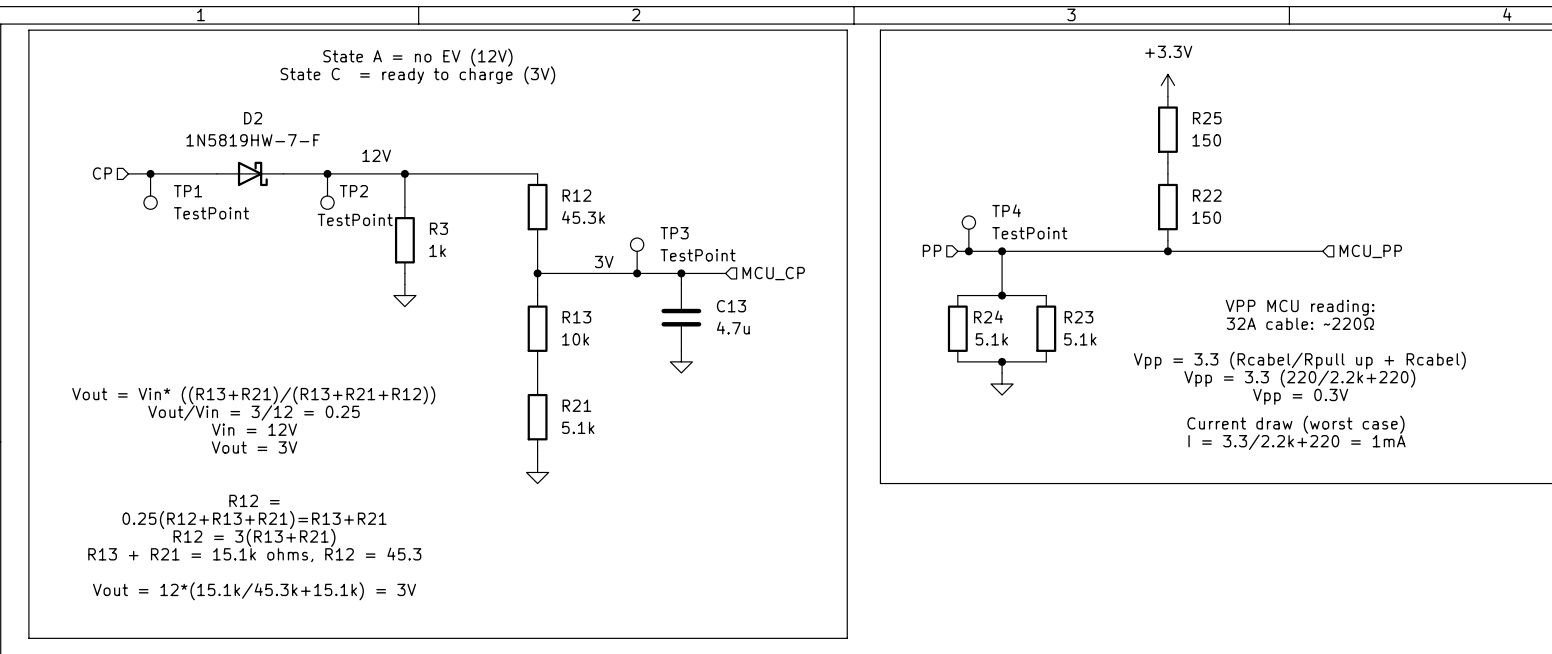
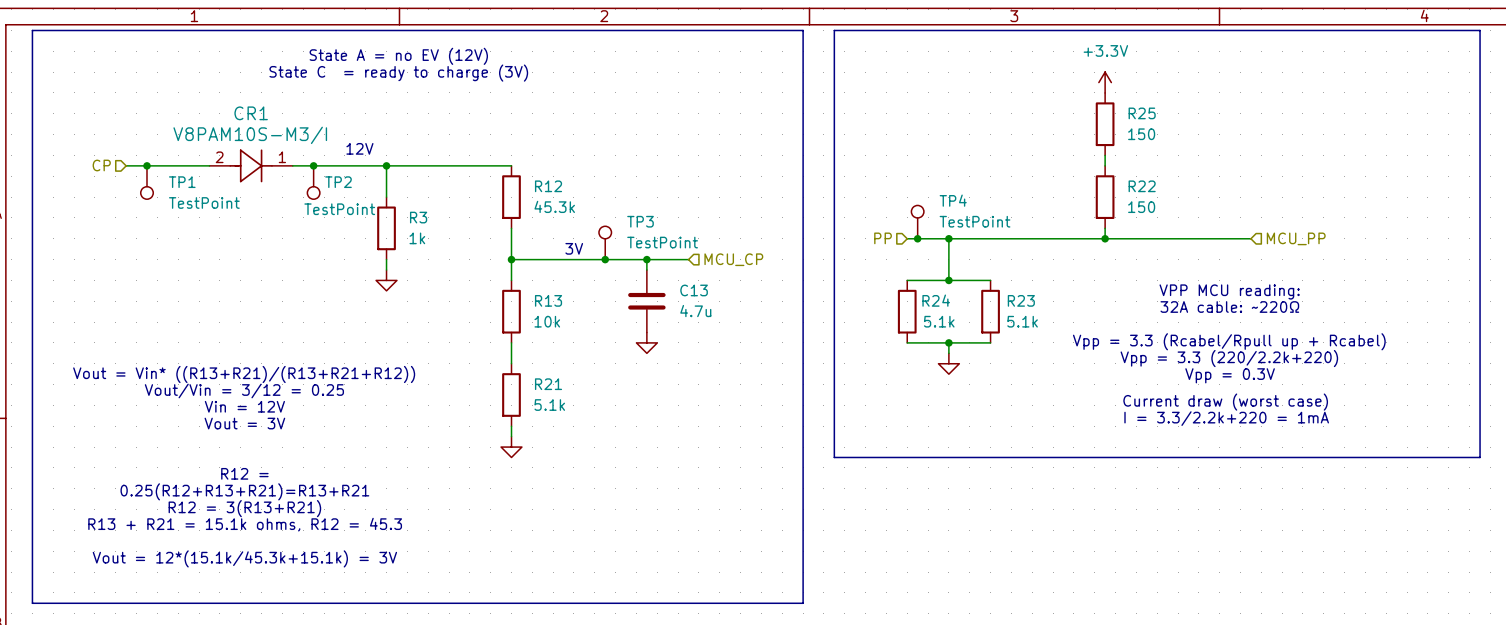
D2: 1N5819HW-7-F (250, 173) -> none
CR1: none -> V8PAM10S-M3/I (251, 165)

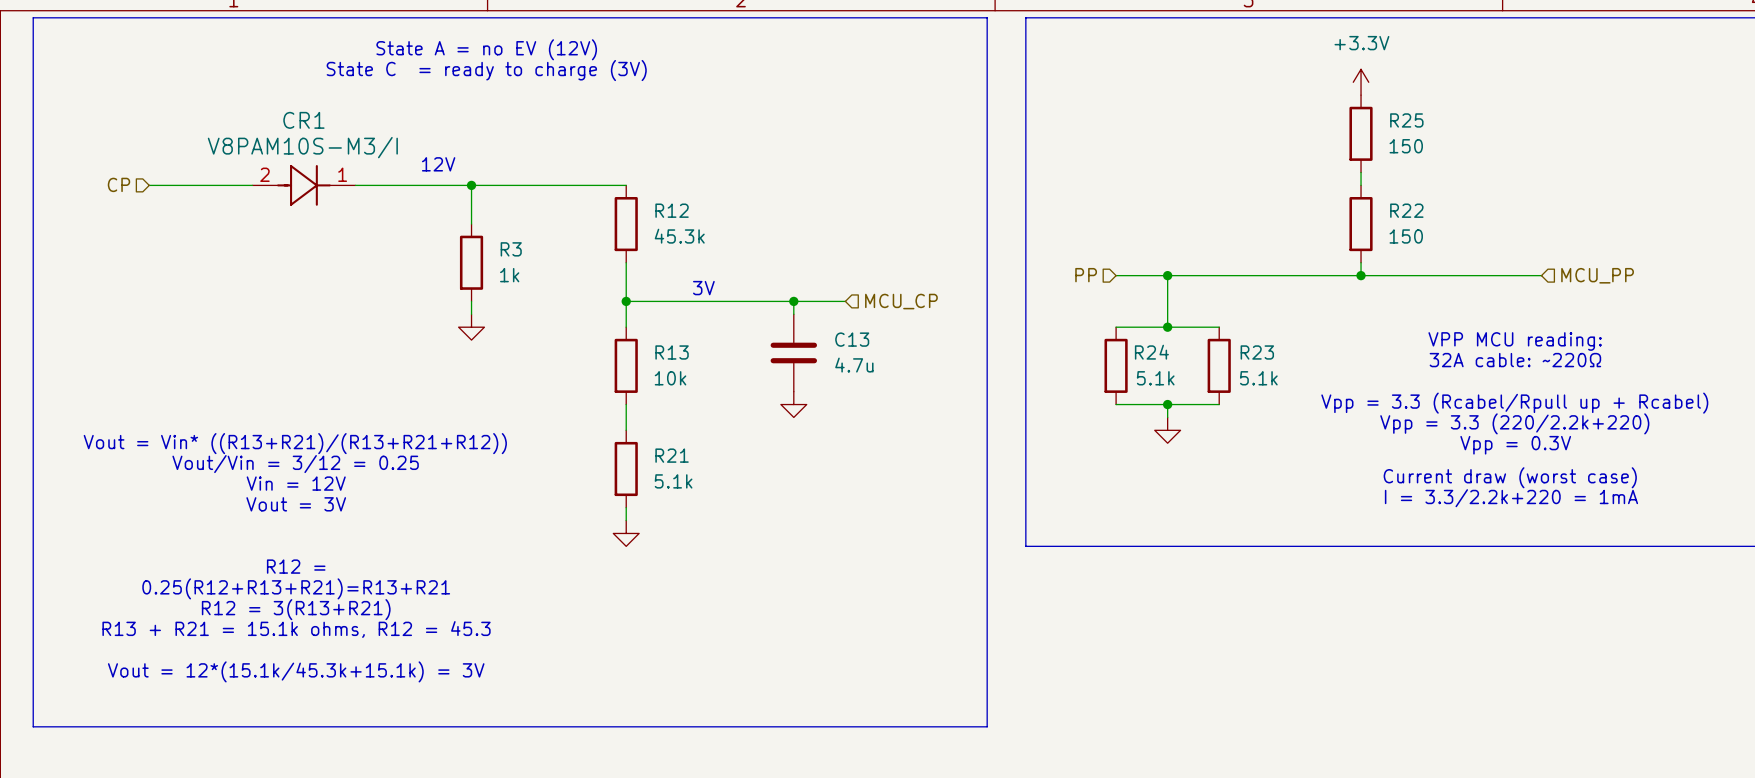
junction: (146, 165) -> none
junction: (313, 165) -> none
TP1: TestPoint (146, 182) -> none
TP2: TestPoint (313, 182) -> none
TP4: TestPoint (917, 222) -> none
junction: (917, 238) -> none
TP3: TestPoint (605, 242) -> none
junction: (605, 259) -> none

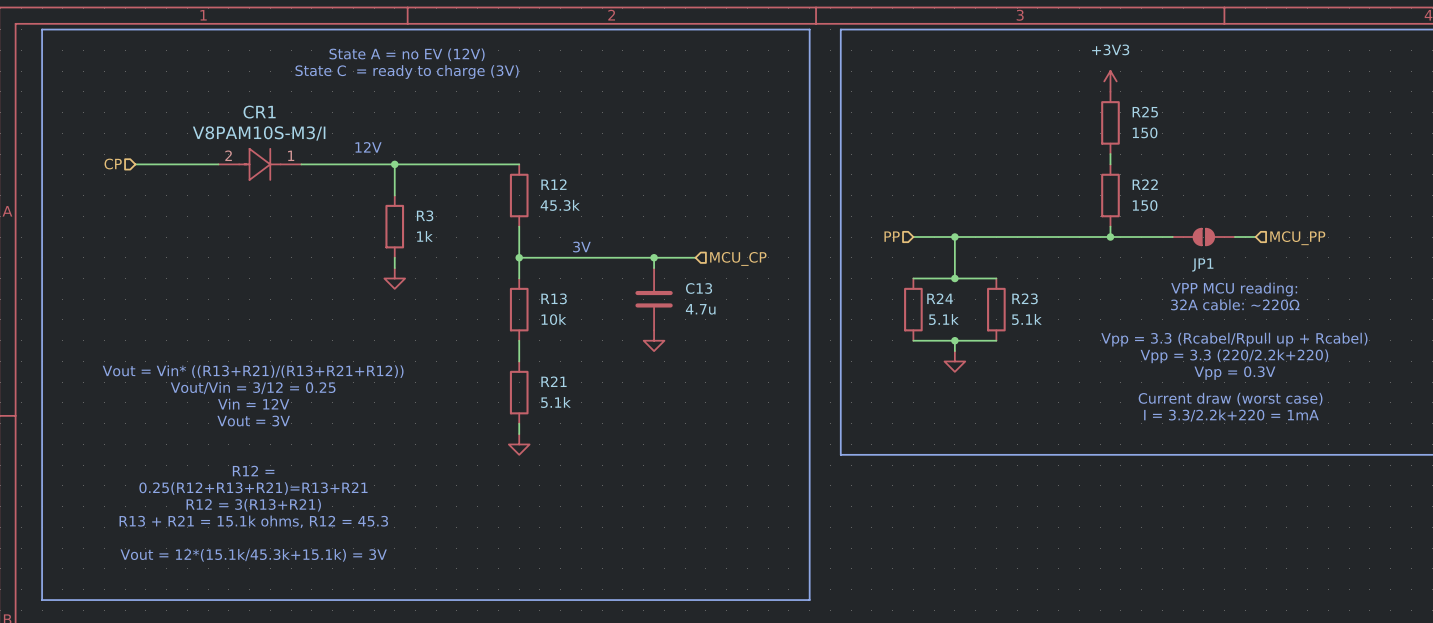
power symbol: +3.3V (1361, 82) -> +3V3 (1110, 81)
JP1: none -> (1203, 237)

